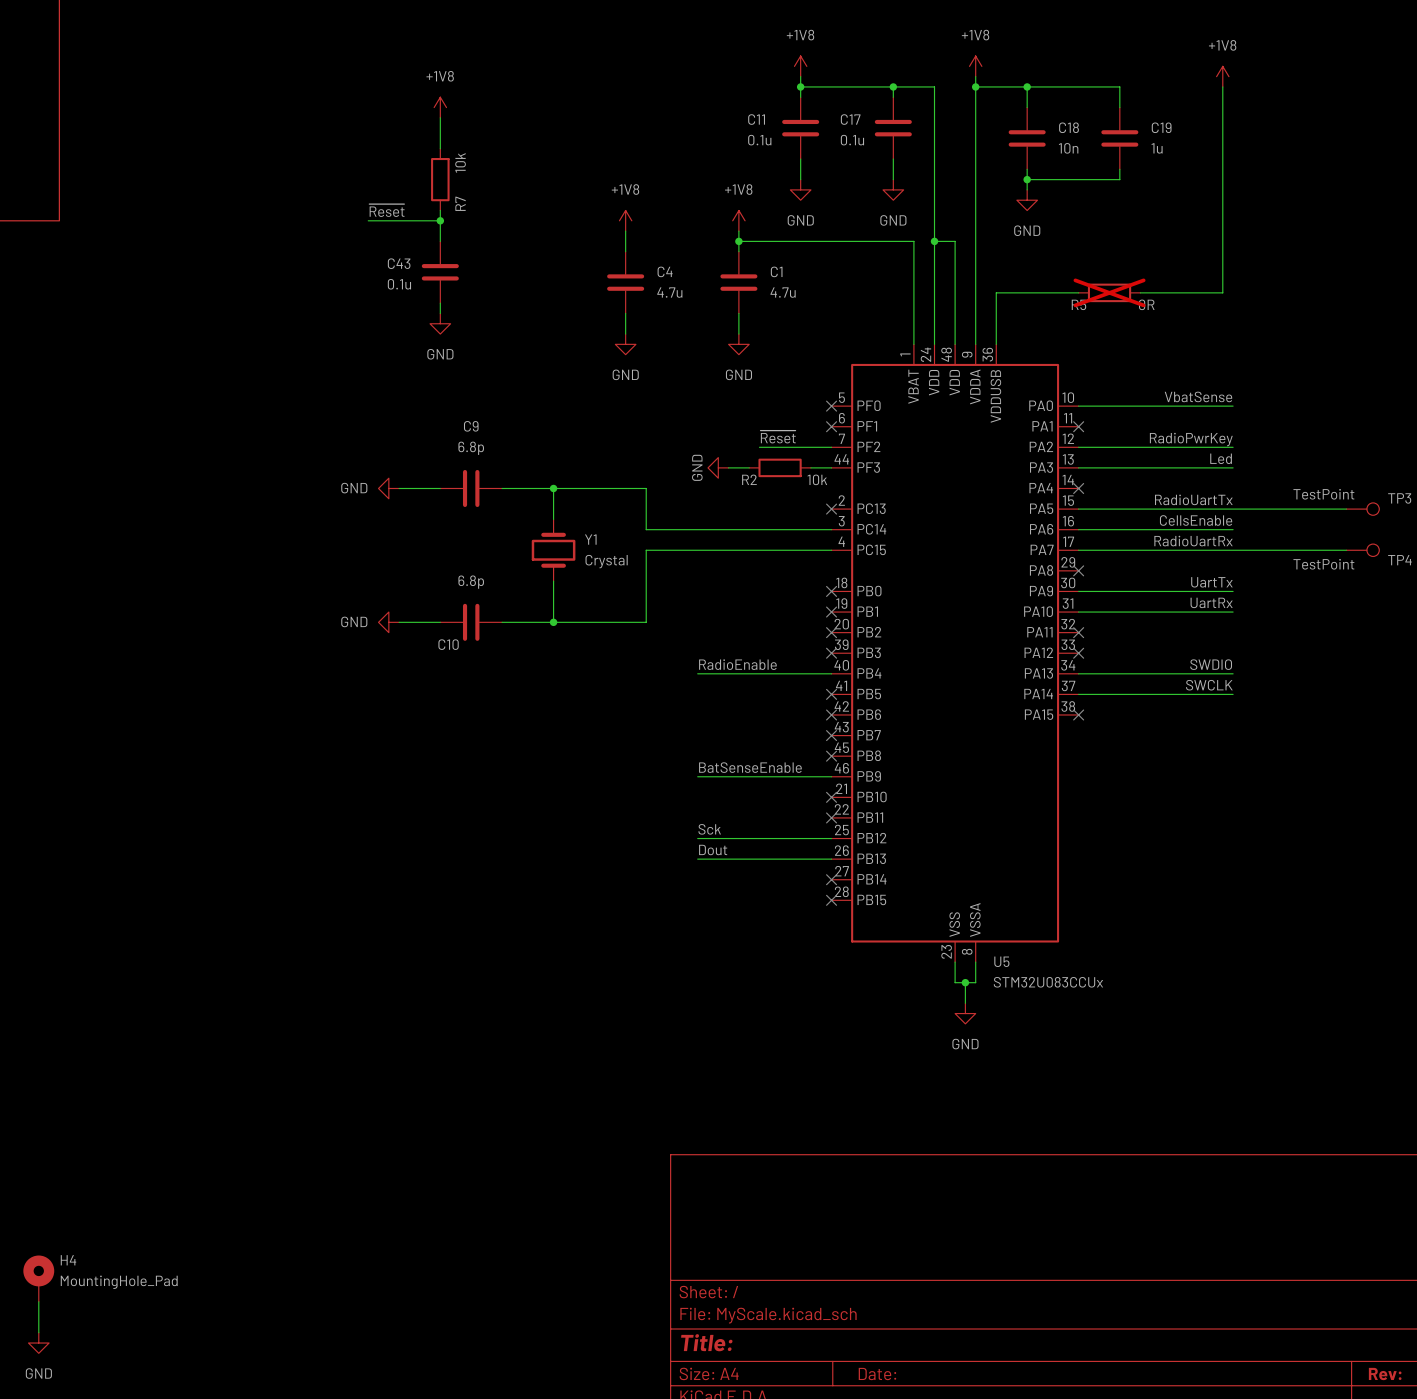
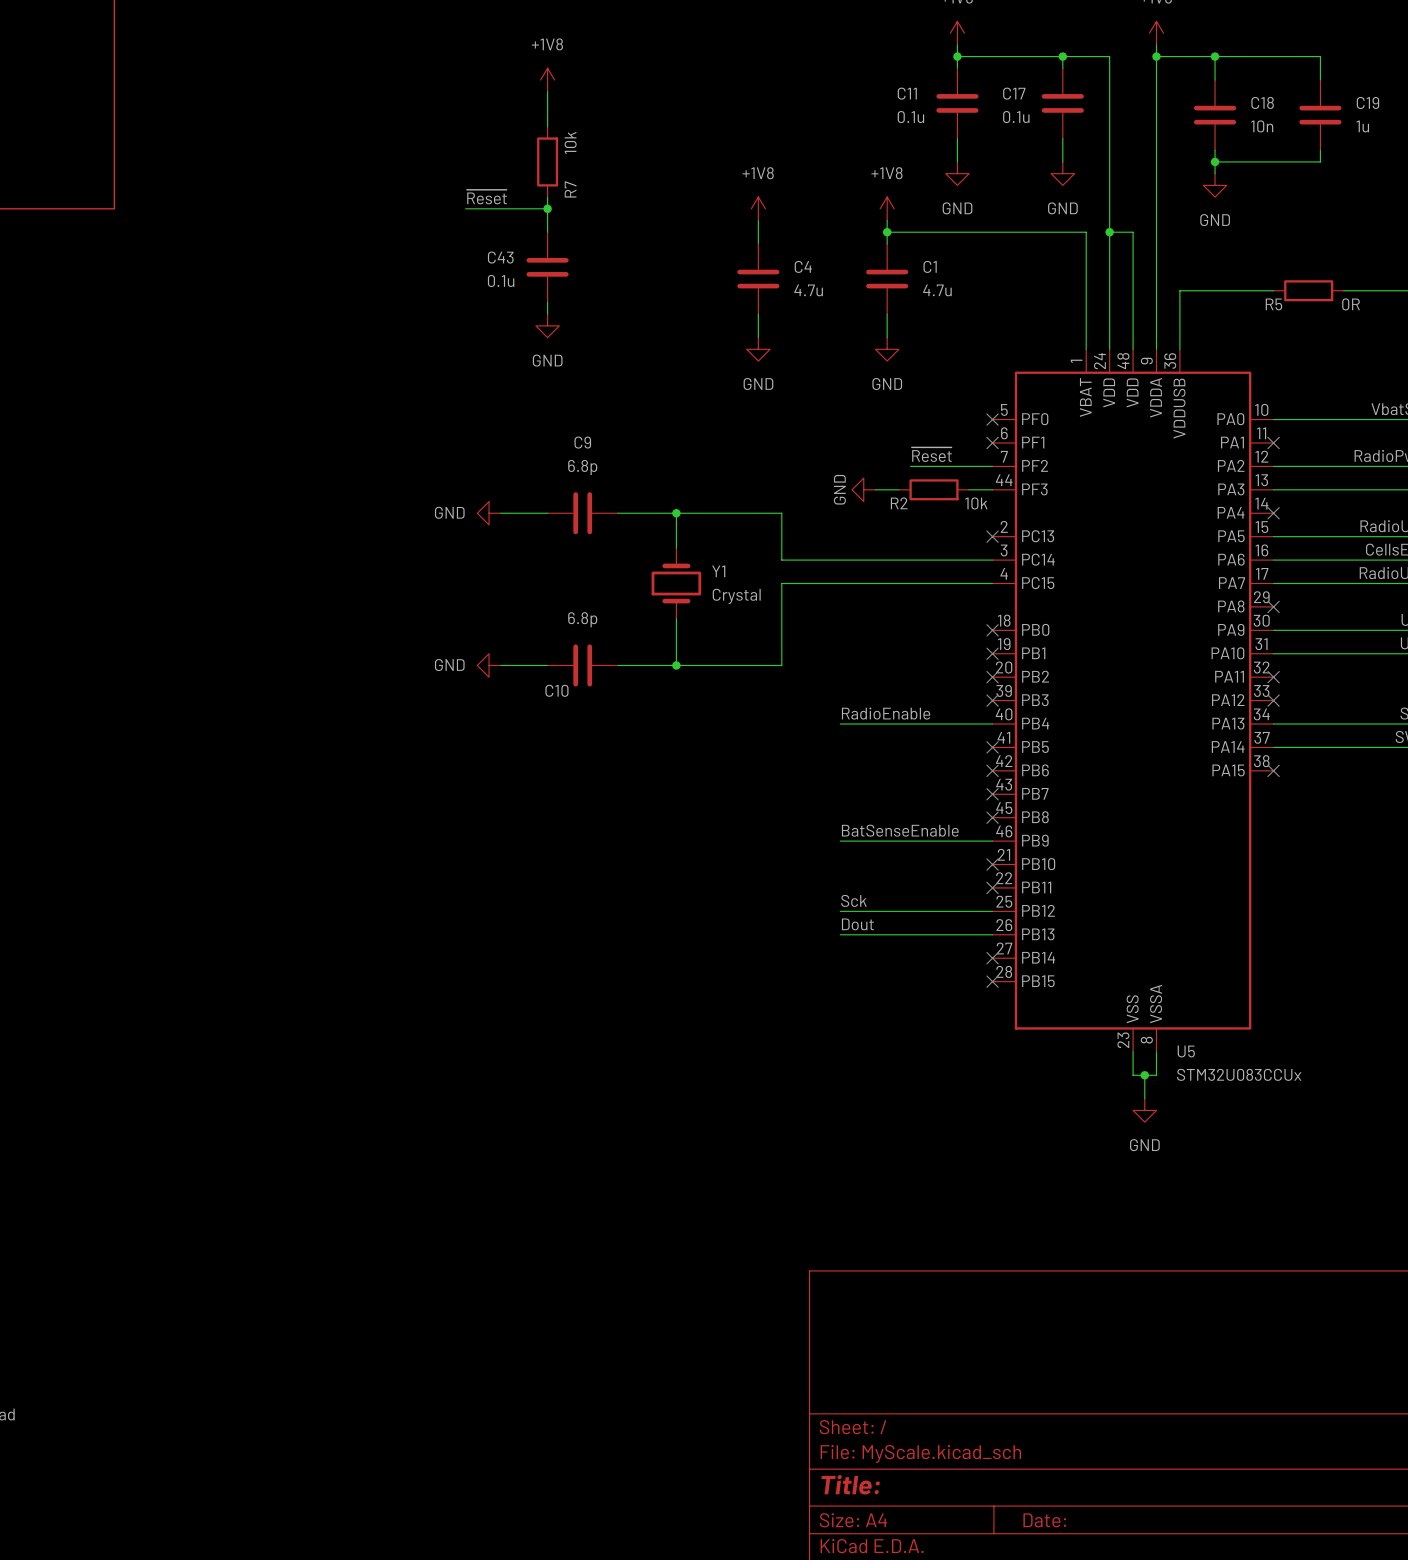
R5 do-not-place cross: (1109, 292) -> none
H4: MountingHole_Pad (38, 1278) -> none
wire: (38, 1301) (38, 1332) -> none
power symbol: GND (38, 1343) -> none

